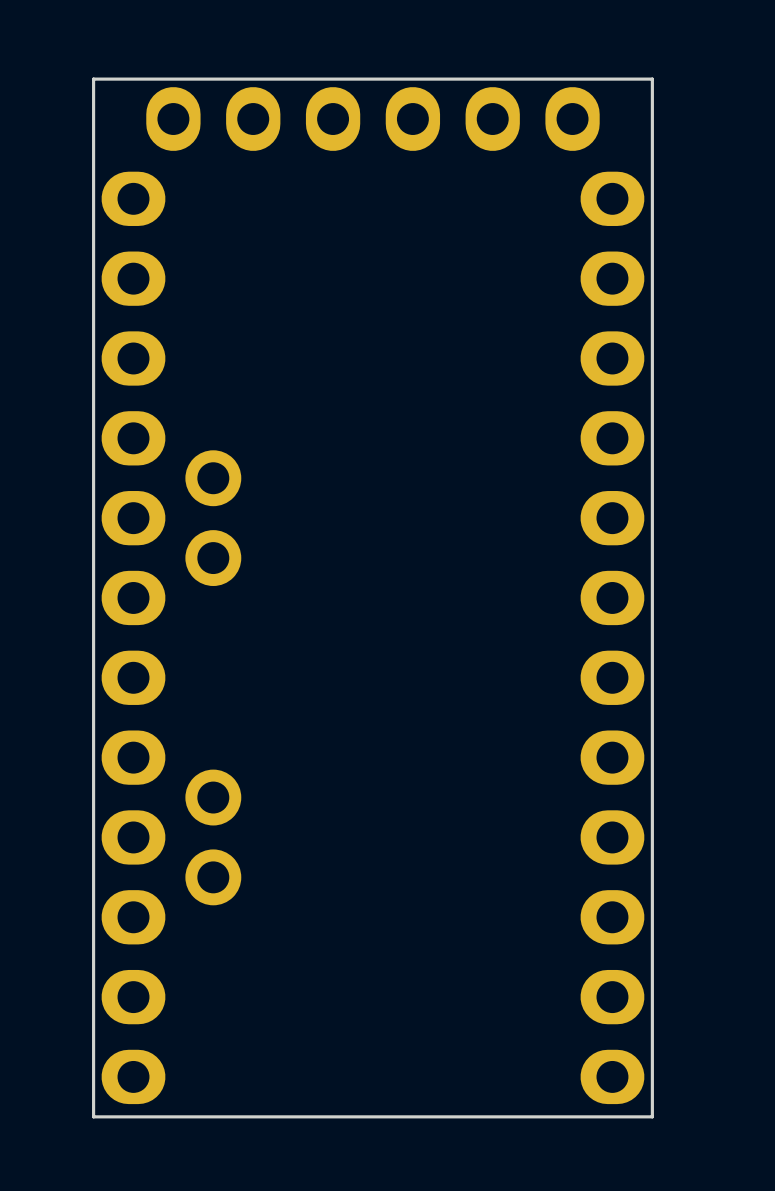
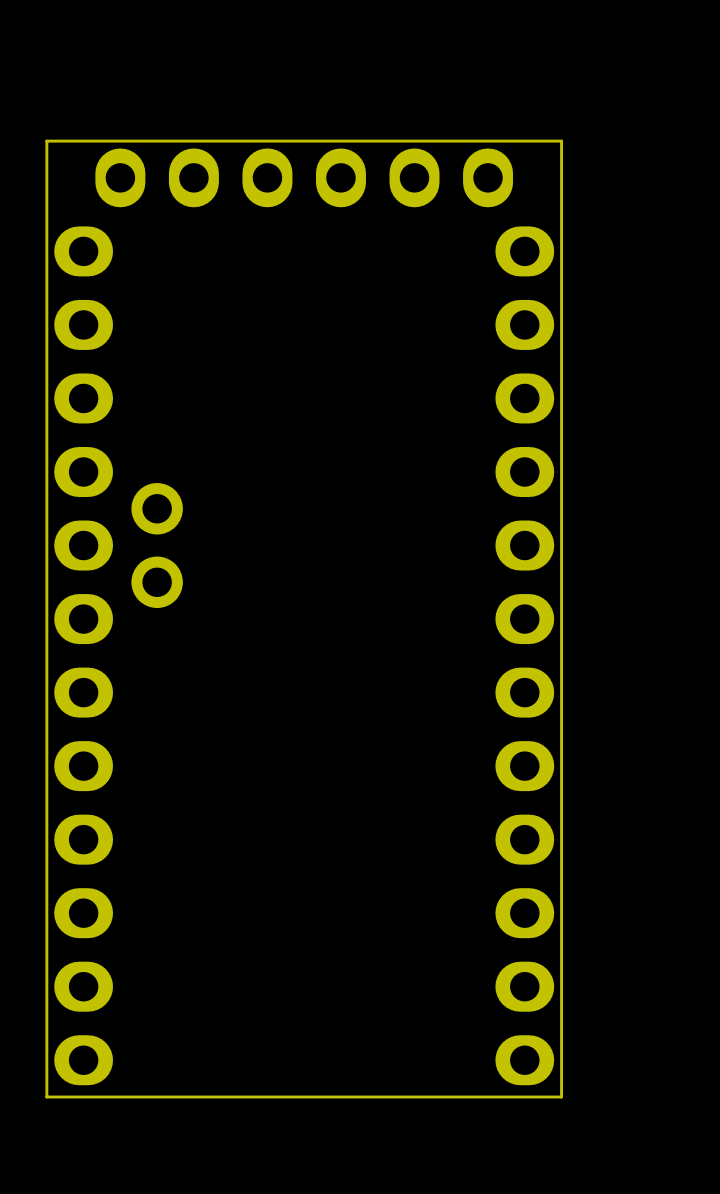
part: (213, 837) -> none

